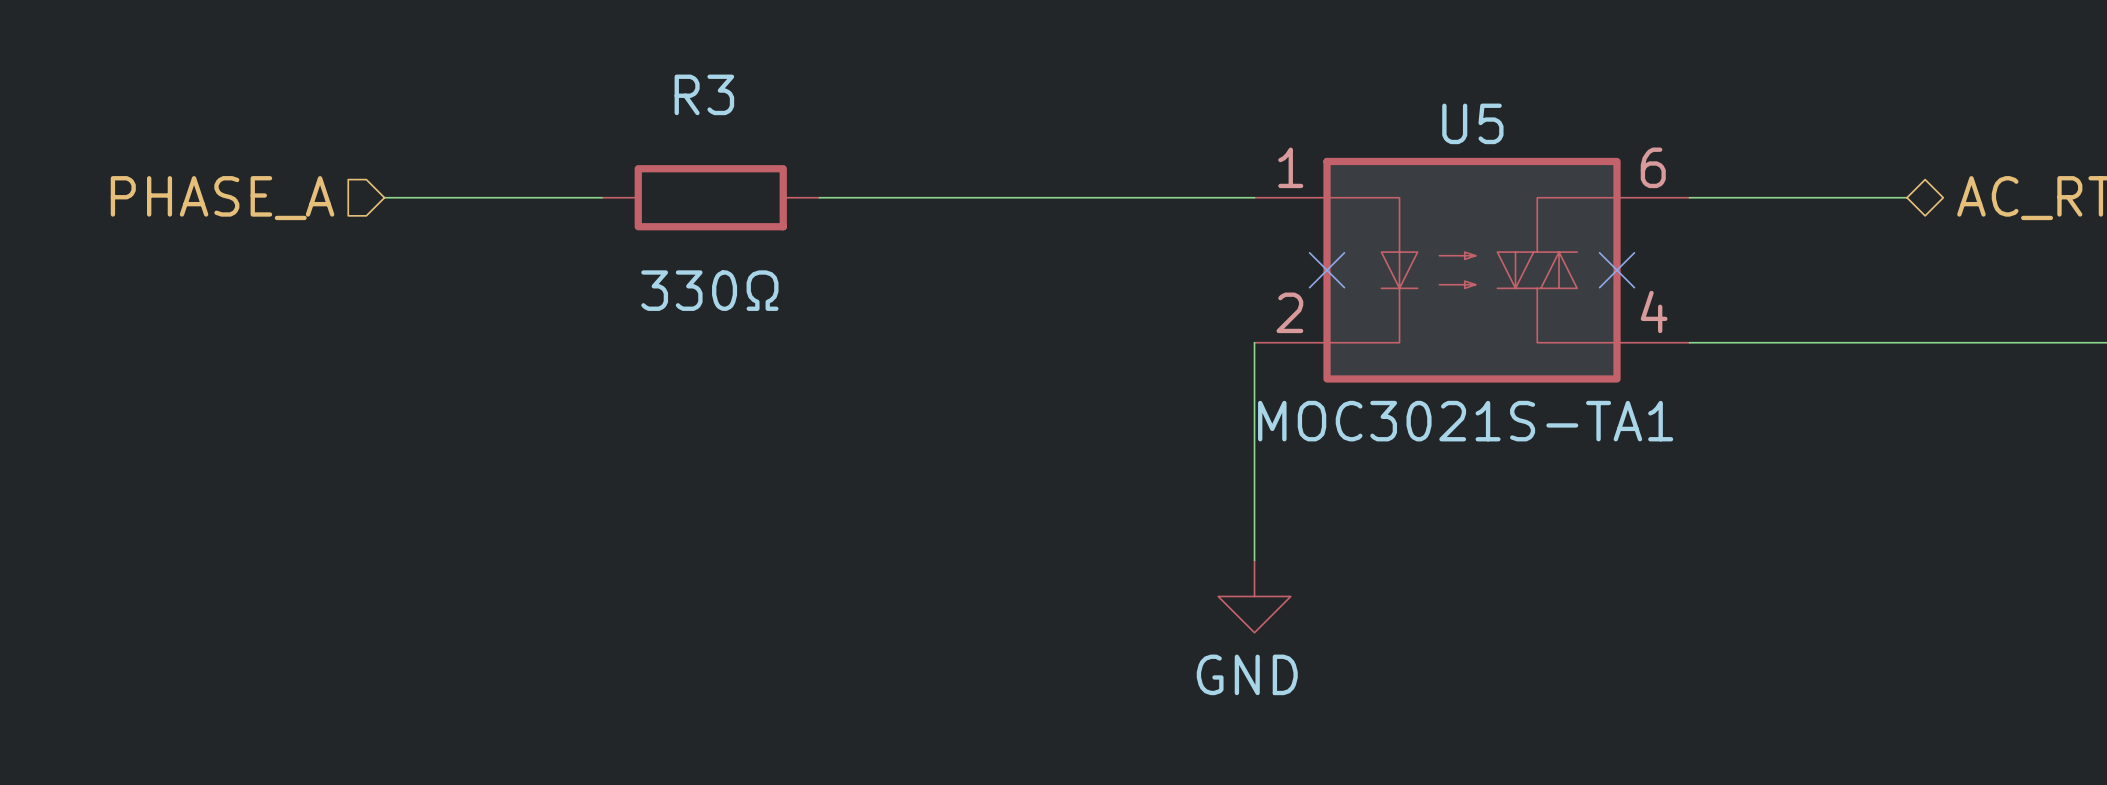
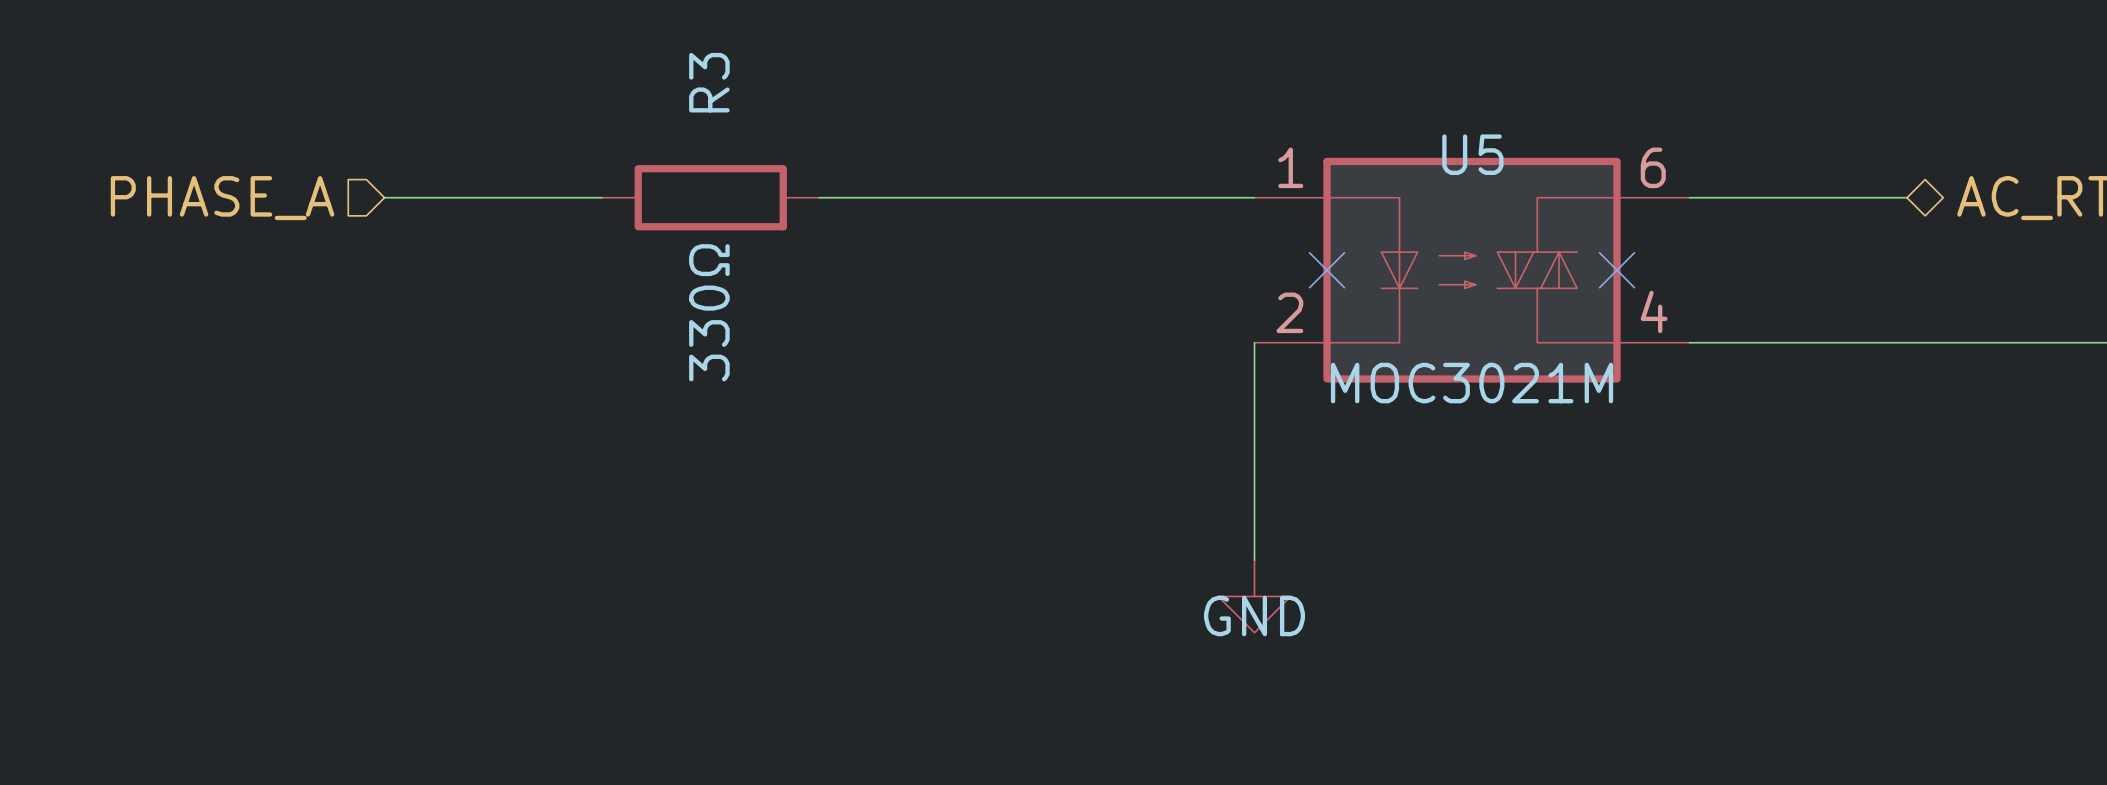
R3 name rotation: 0° (704, 94) -> 90° counterclockwise (709, 82)
U5 name position: U5 (1472, 123) -> U5 (1472, 154)
R3 value rotation: 0° (709, 290) -> 90° counterclockwise (709, 312)
U5 value: MOC3021S-TA1 (1465, 421) -> MOC3021M (1472, 383)
power symbol text position: GND (1247, 674) -> GND (1254, 615)

